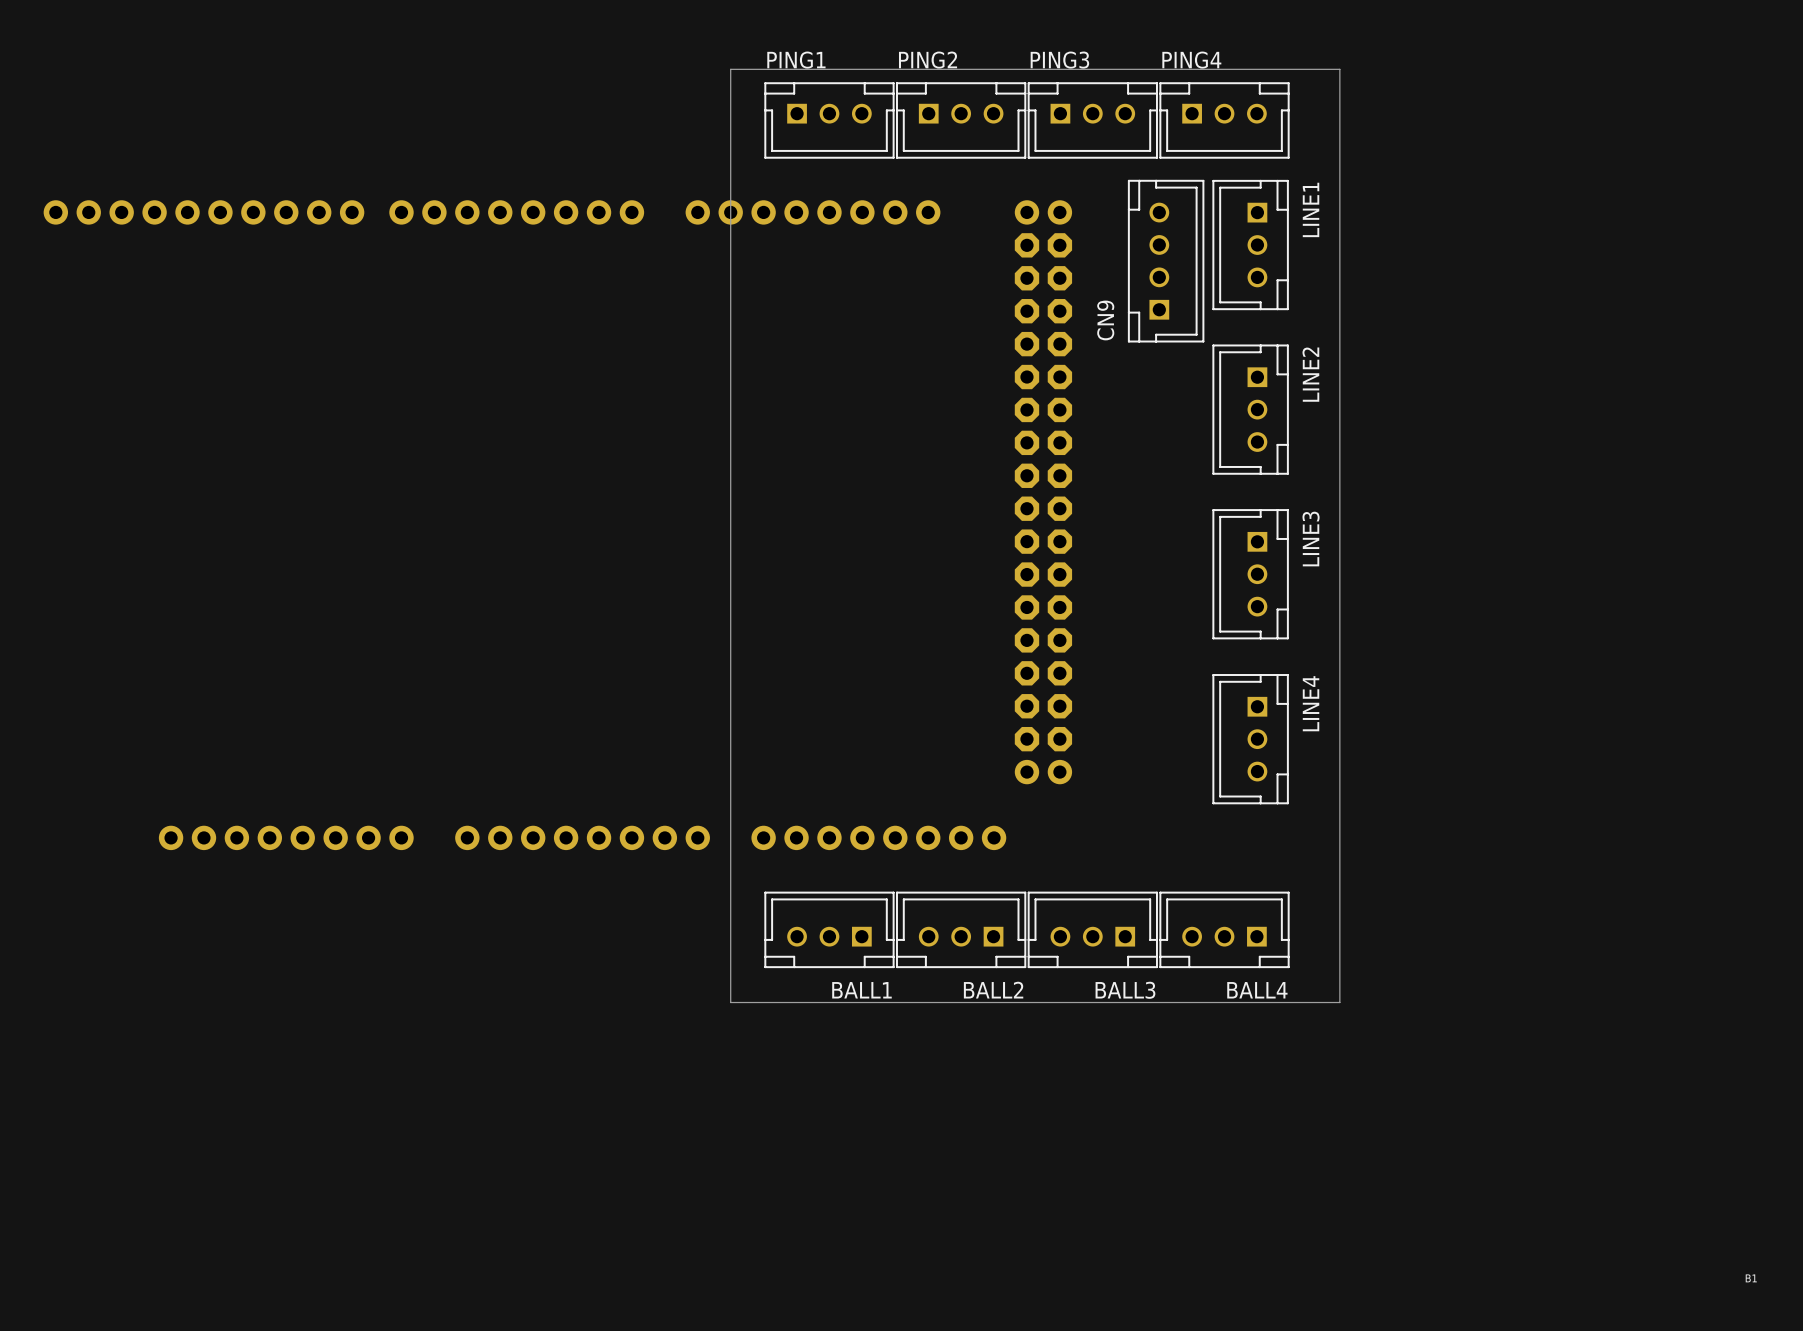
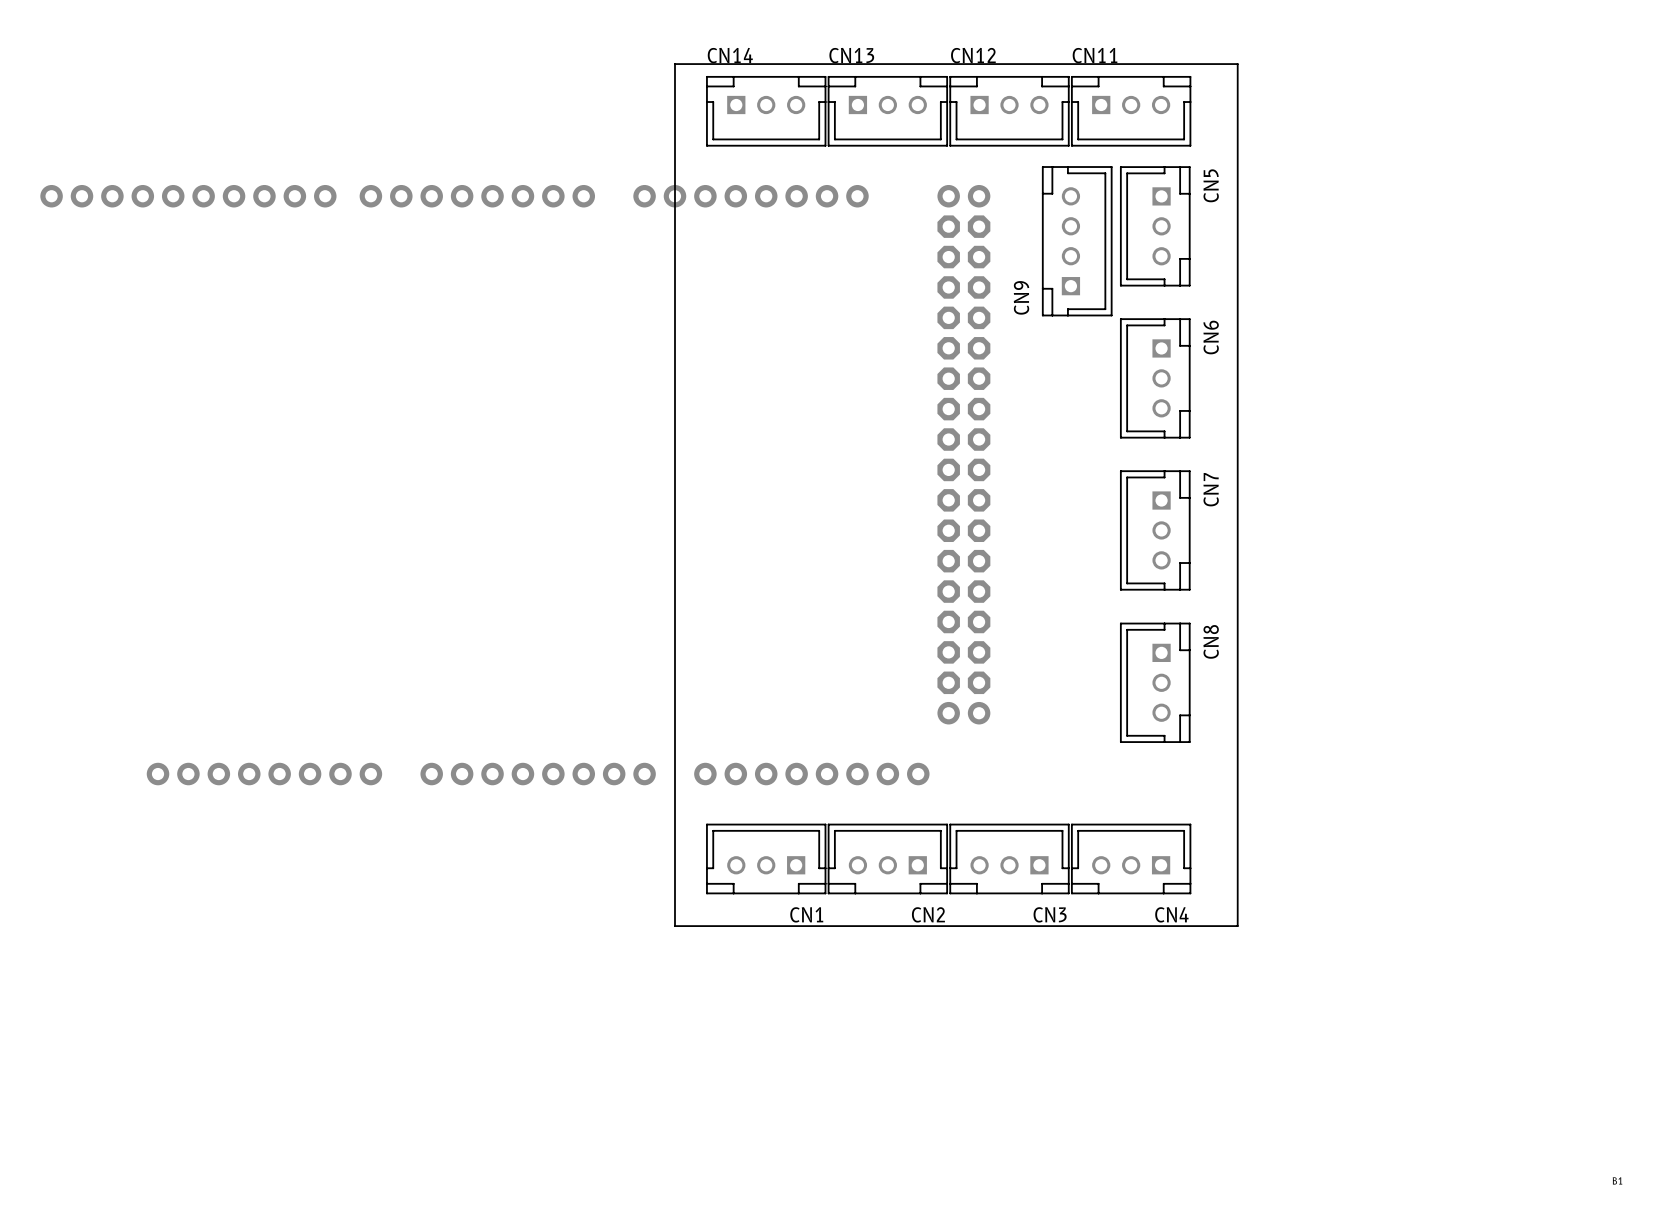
PING1 name: PING1 (796, 60) -> CN14 (730, 55)
PING2 name: PING2 (928, 60) -> CN13 (851, 55)
PING3 name: PING3 (1059, 60) -> CN12 (973, 55)
PING4 name: PING4 (1191, 60) -> CN11 (1095, 55)
LINE1 name: LINE1 (1311, 209) -> CN5 (1211, 185)
LINE2 name: LINE2 (1310, 374) -> CN6 (1211, 337)
LINE3 name: LINE3 (1311, 539) -> CN7 (1211, 489)
LINE4 name: LINE4 (1311, 703) -> CN8 (1211, 641)
BALL1 name: BALL1 (861, 990) -> CN1 (806, 914)
BALL2 name: BALL2 (993, 990) -> CN2 (928, 914)
BALL3 name: BALL3 (1125, 990) -> CN3 (1050, 914)
BALL4 name: BALL4 (1257, 990) -> CN4 (1171, 914)

